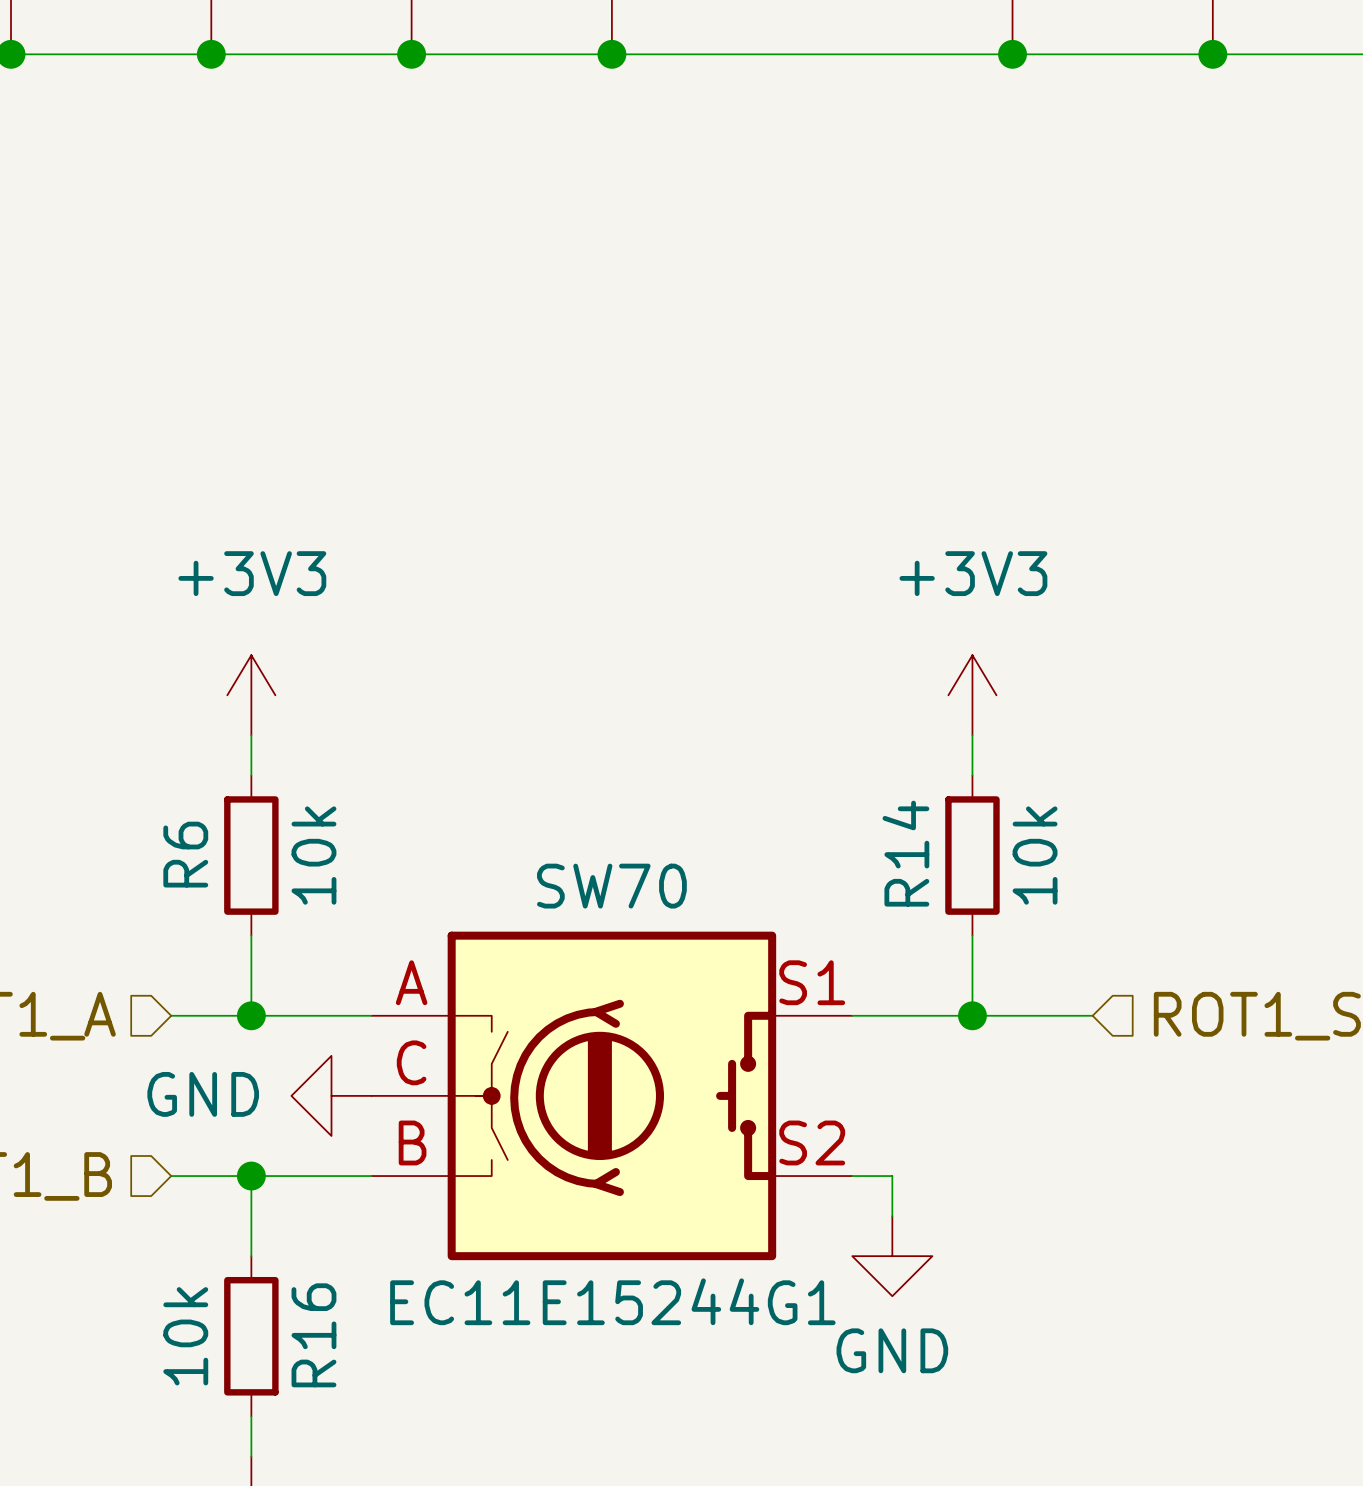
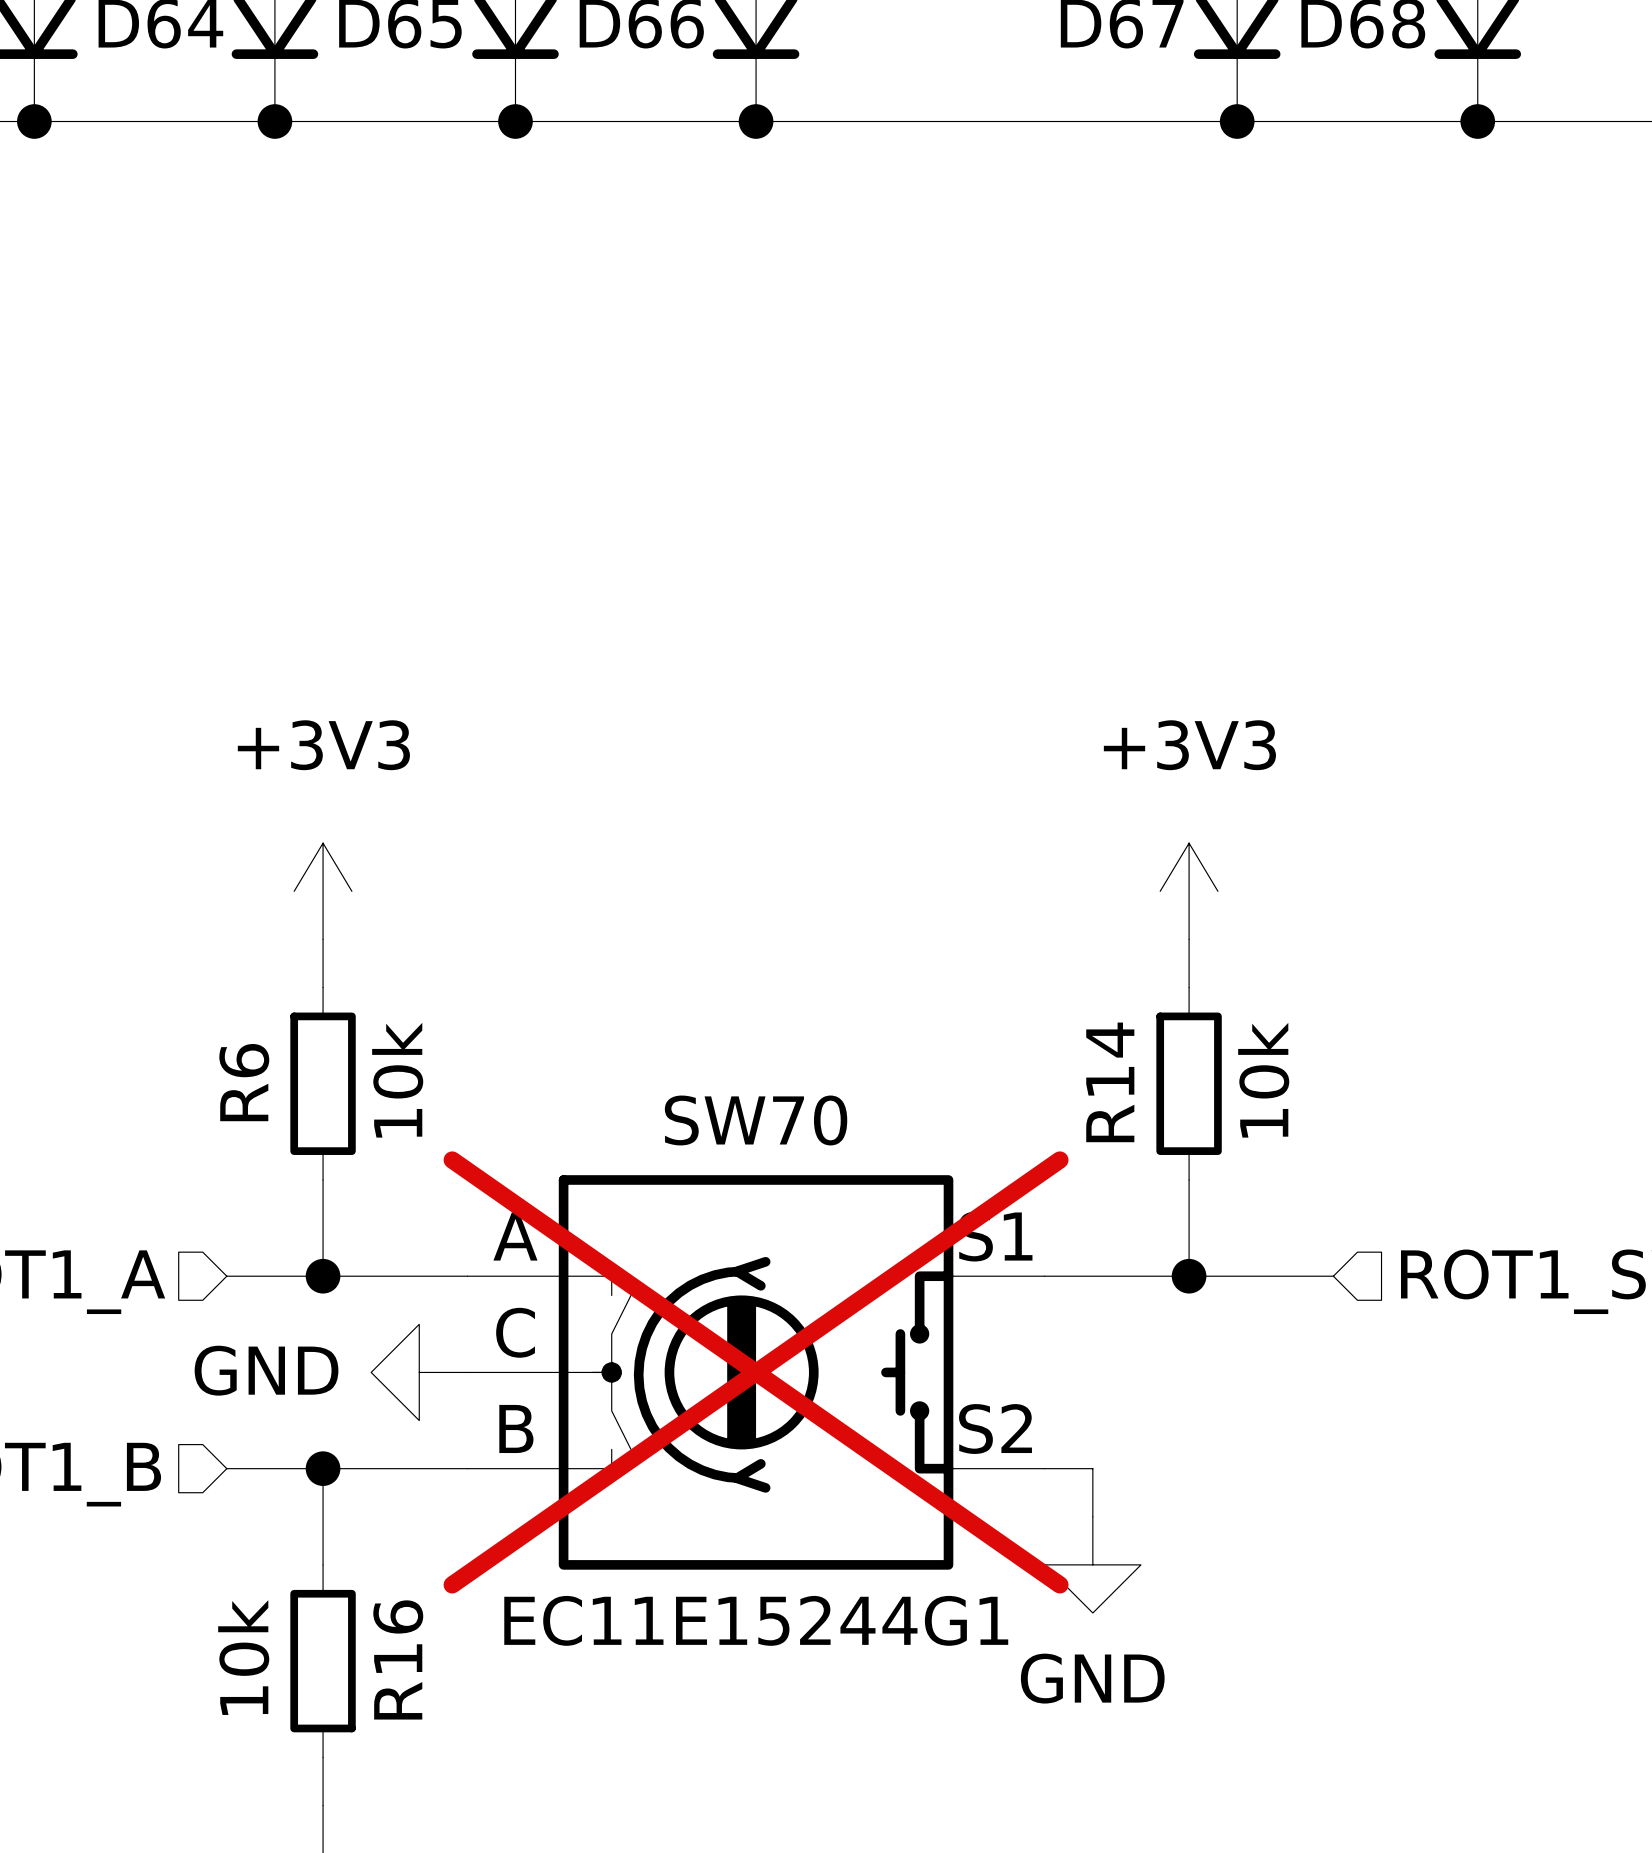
SW70 do-not-place cross: none -> (756, 1372)

